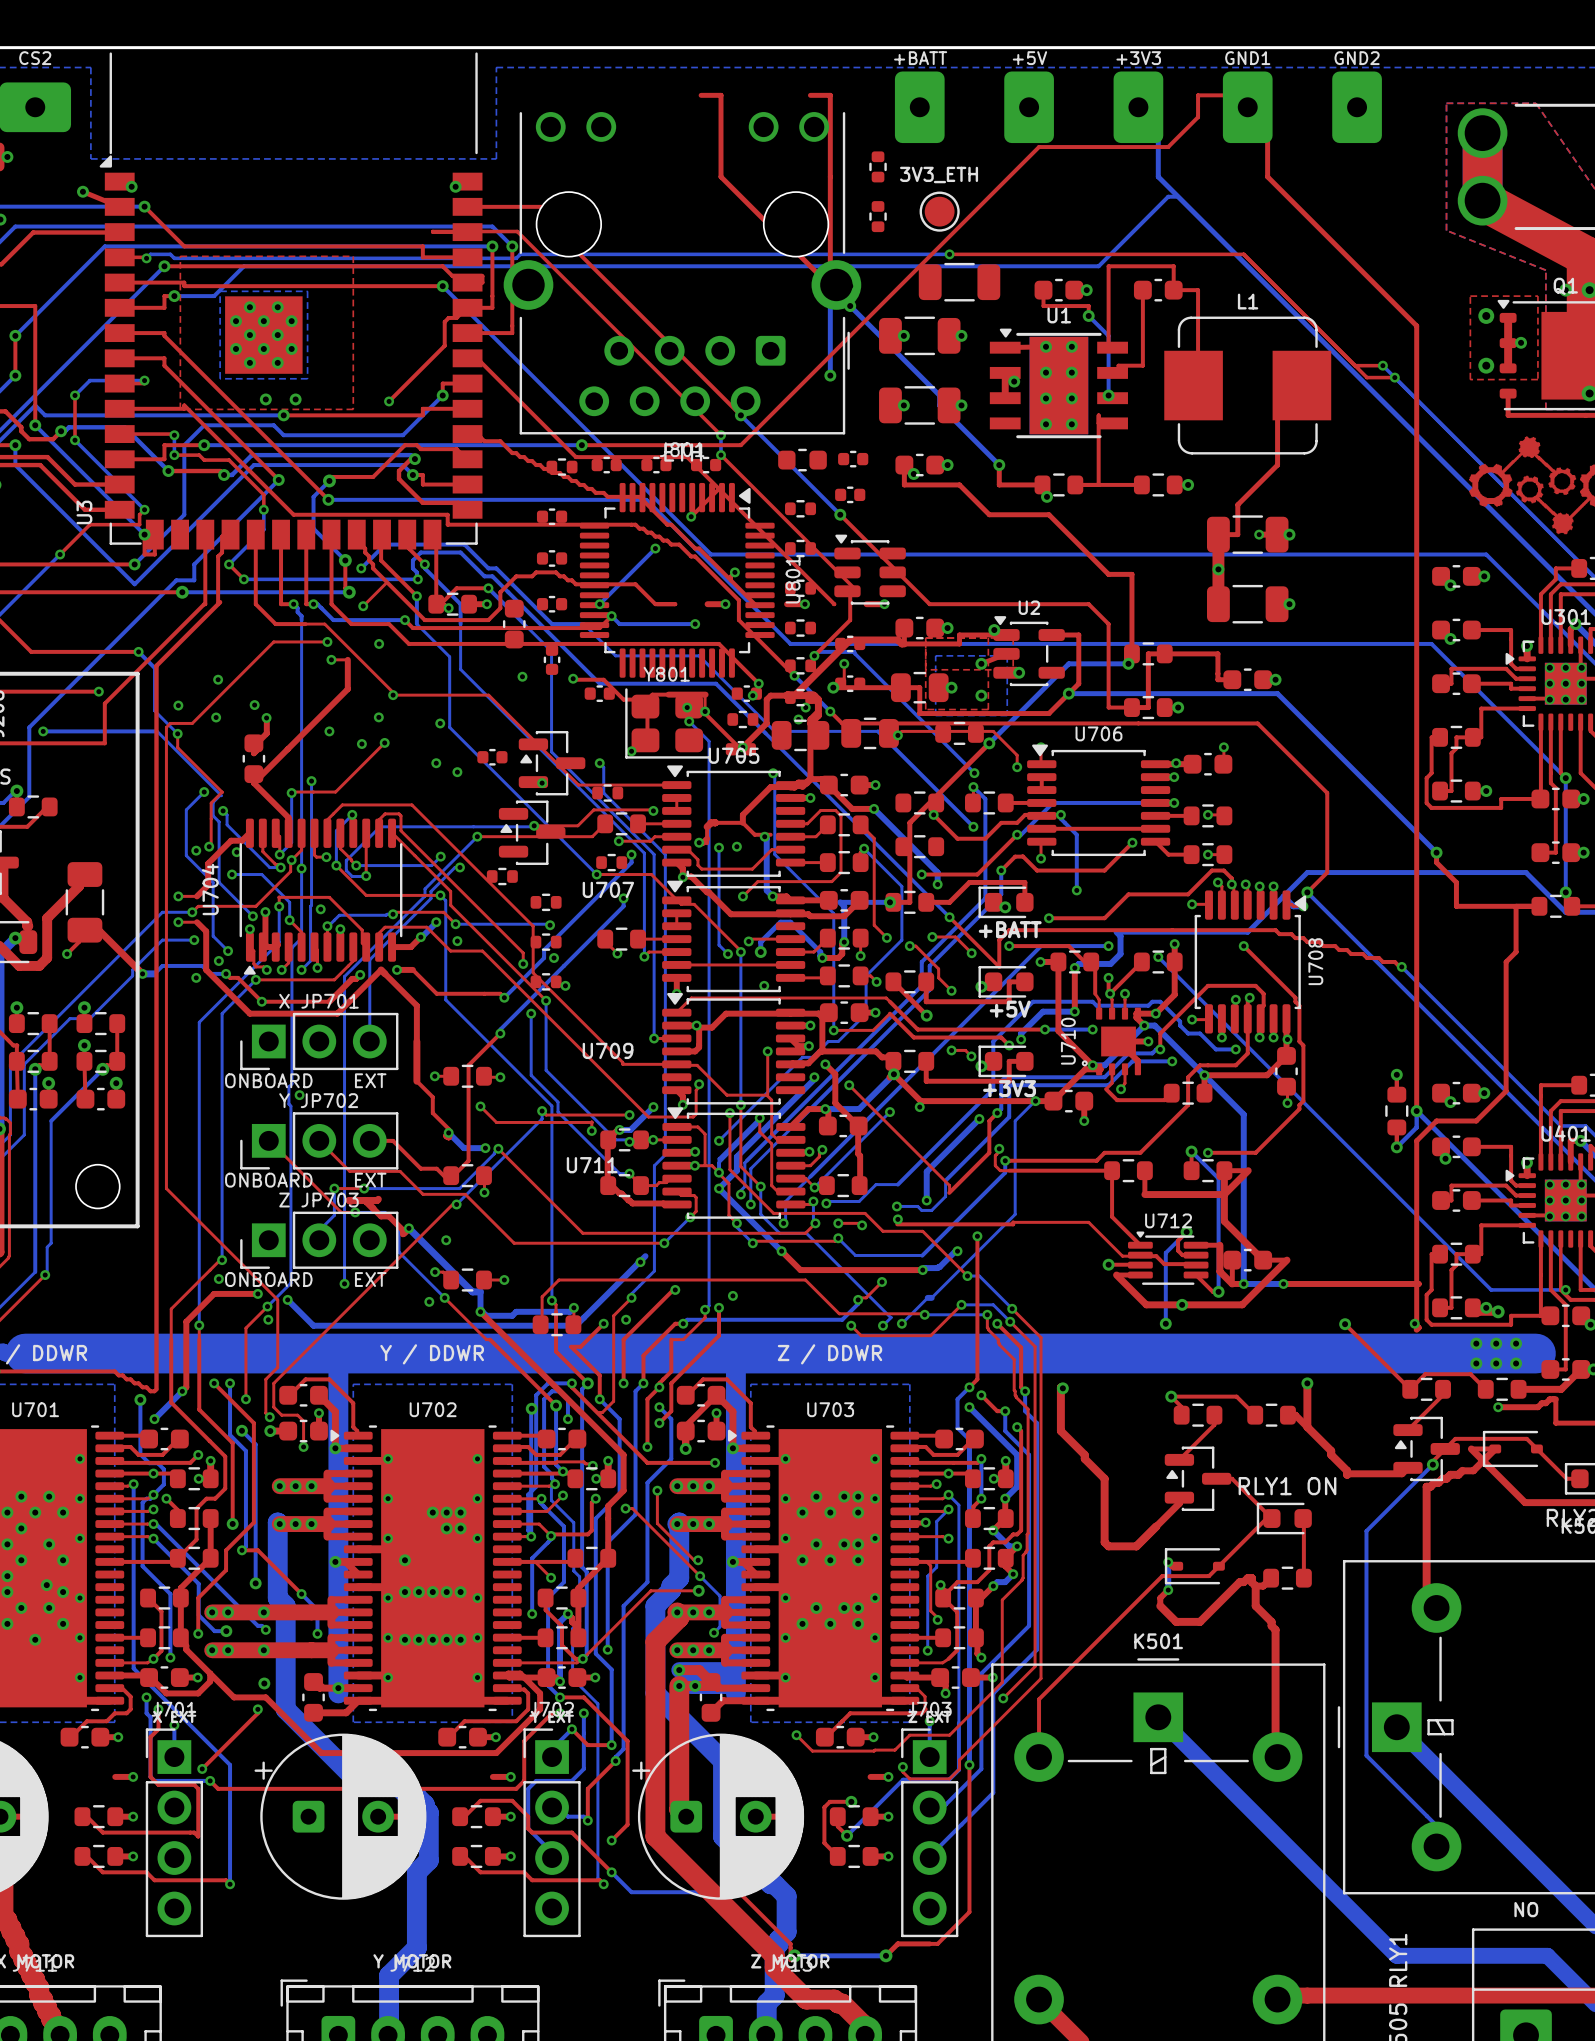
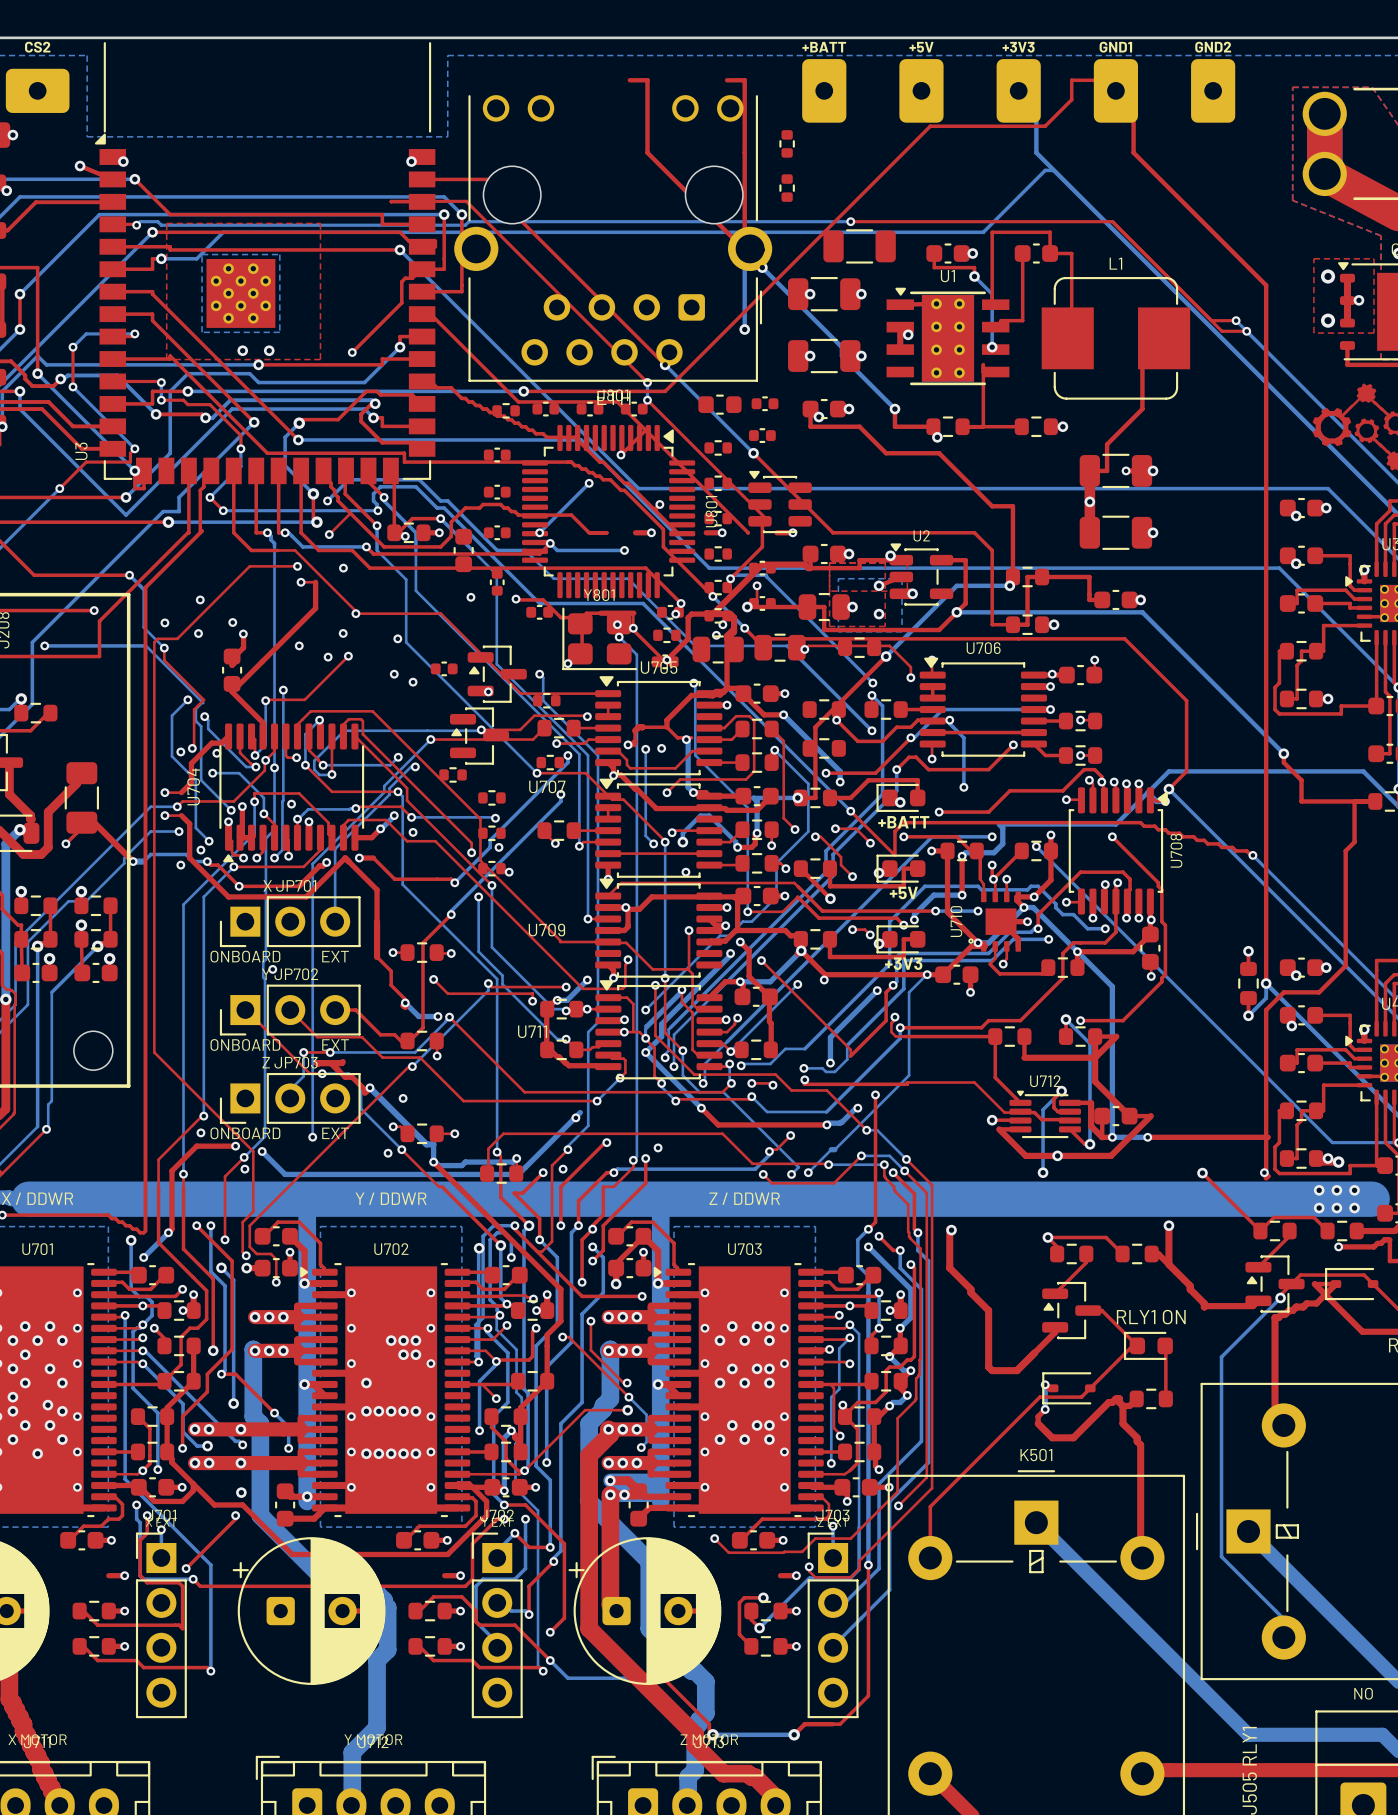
text: 3V3_ETH (939, 174) -> none
part: (939, 211) -> none

